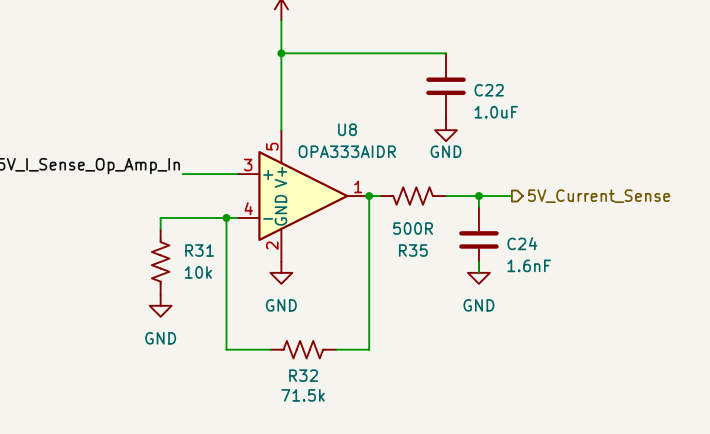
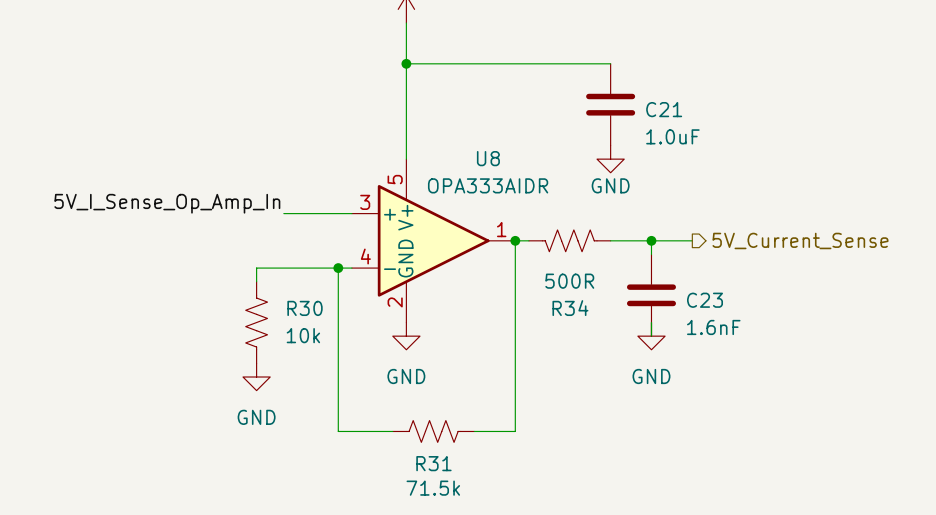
C22 name: C22 (489, 90) -> C21 (664, 109)
C24 name: C24 (522, 243) -> C23 (705, 300)
R31 name: R31 (199, 250) -> R30 (305, 308)
R35 name: R35 (413, 250) -> R34 (570, 308)
R32 name: R32 (303, 375) -> R31 (433, 463)

